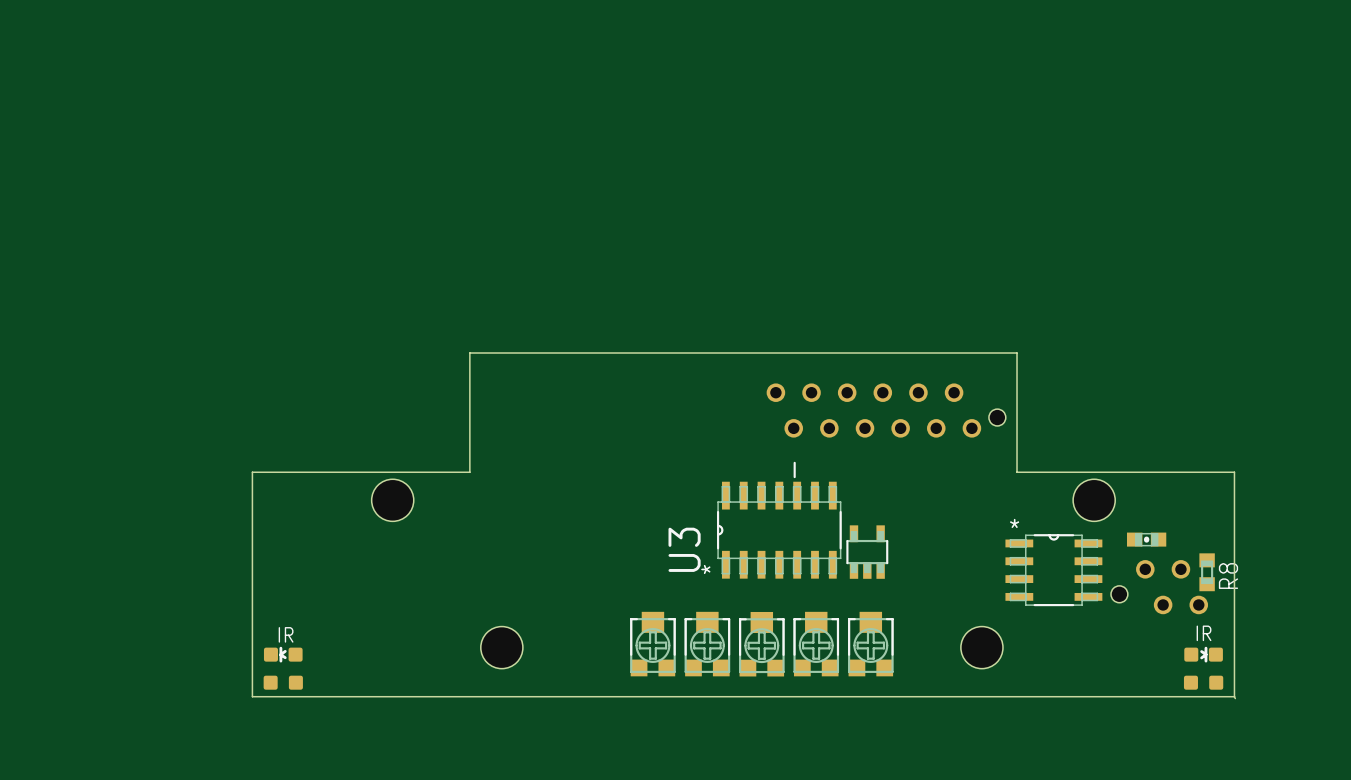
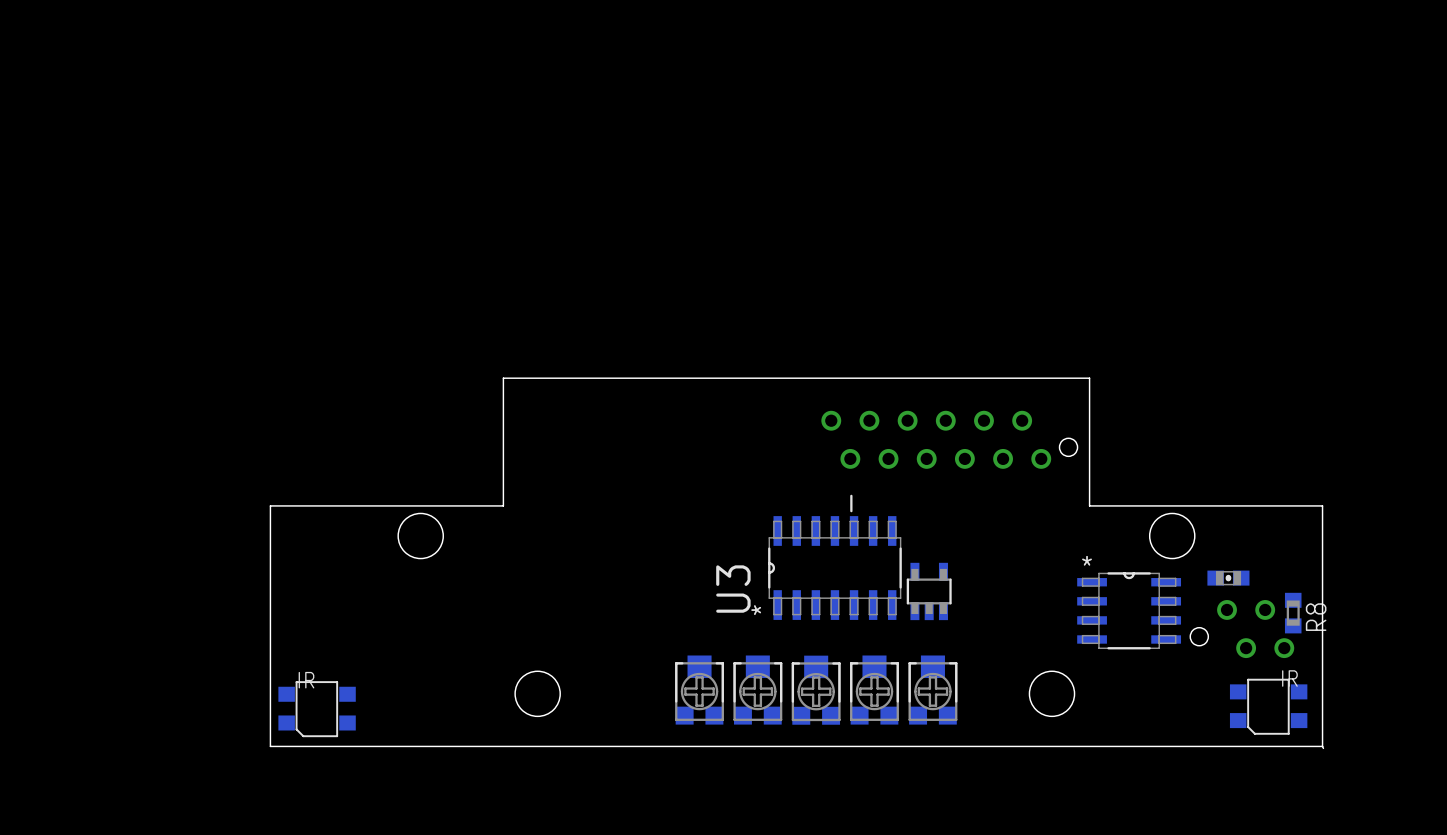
part: (283, 654) -> none
part: (1203, 654) -> none
part: none -> (1268, 706)
part: none -> (317, 709)
part: (283, 682) -> none
part: (1203, 682) -> none

